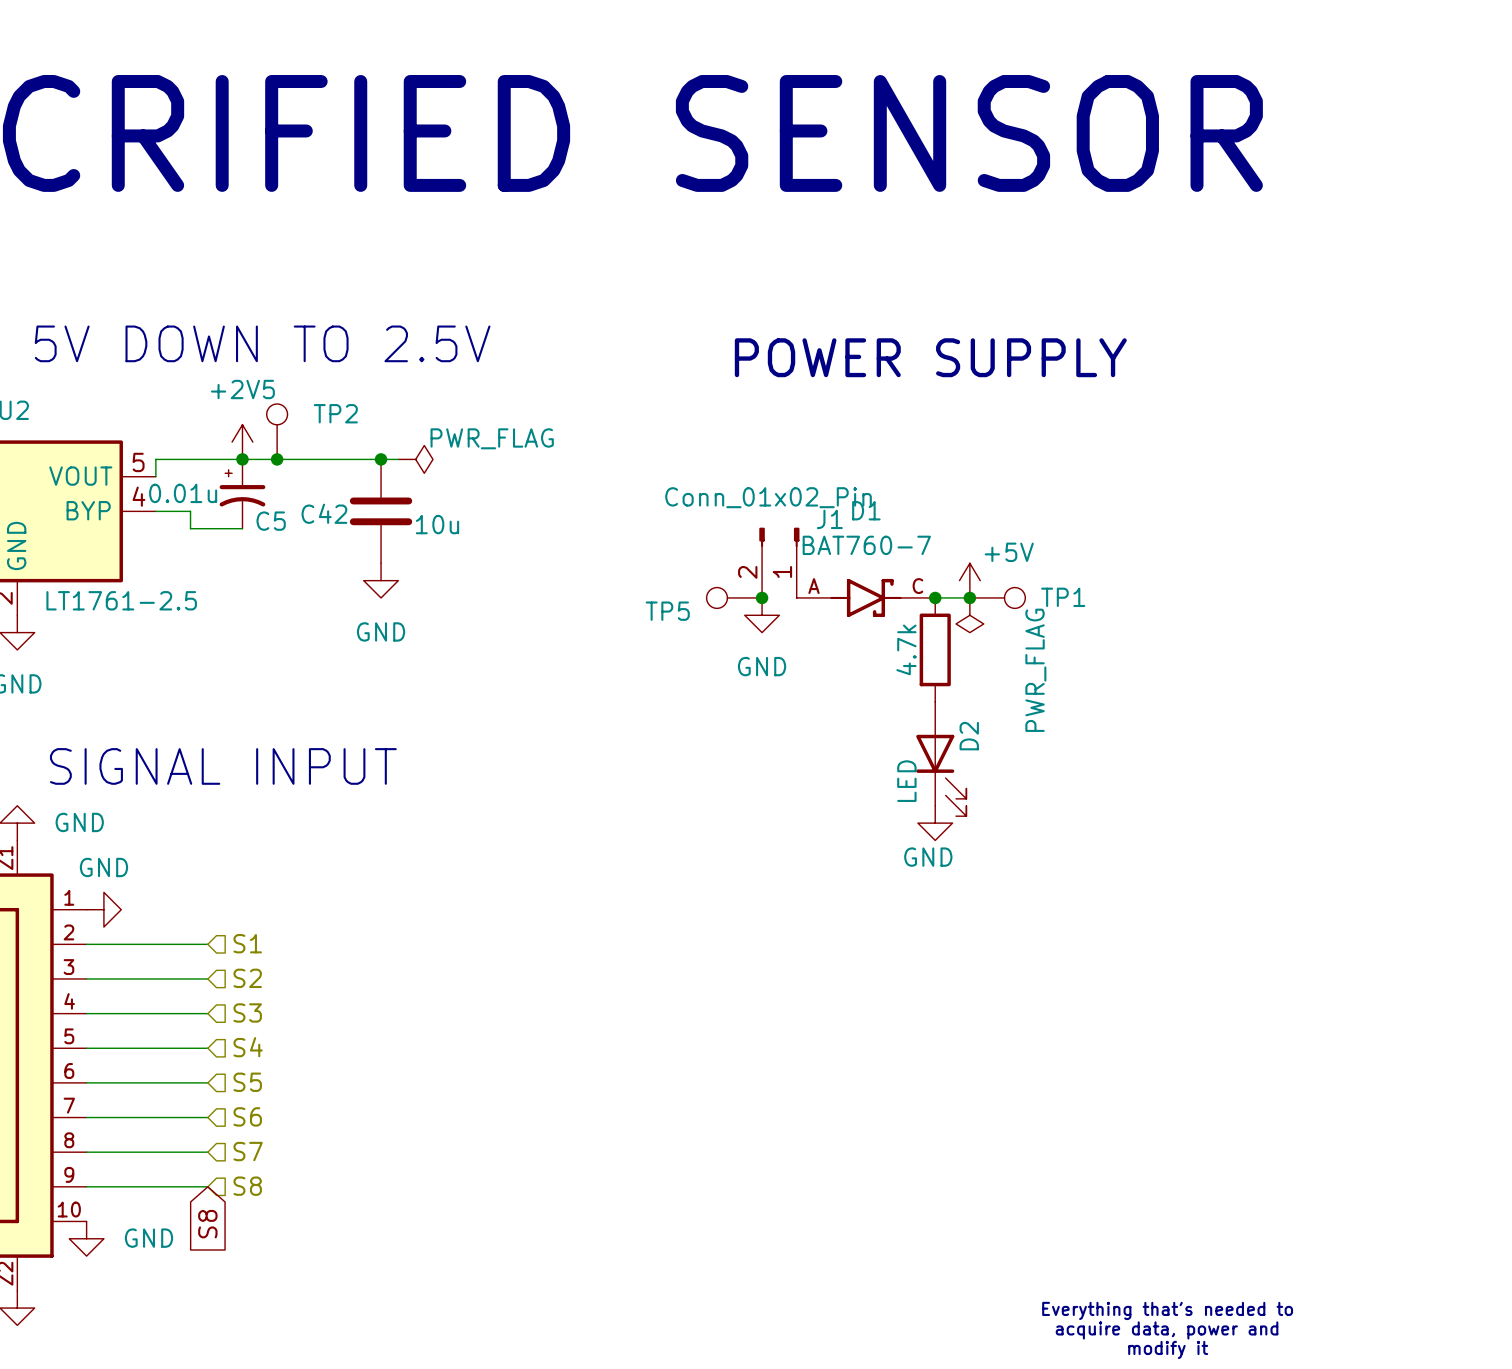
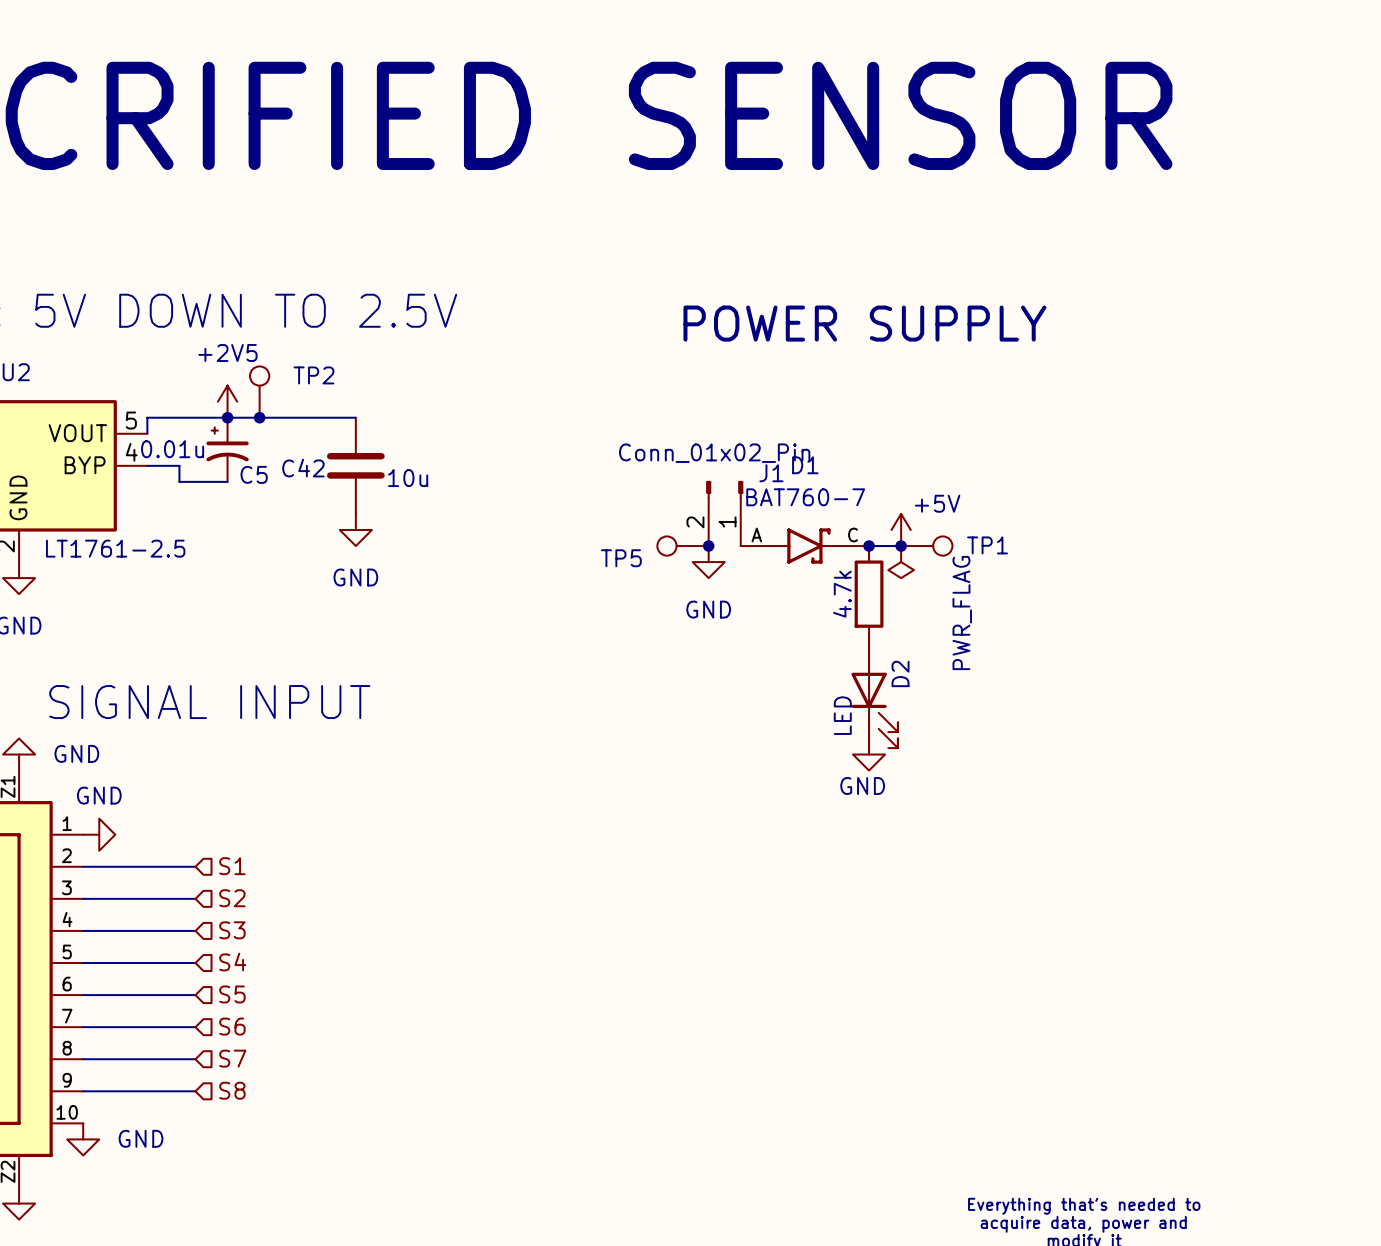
wire: (381, 459) (398, 459) -> none
junction: (381, 459) -> none
power symbol: PWR_FLAG (415, 459) -> none
global label: S8 (207, 1224) -> none

